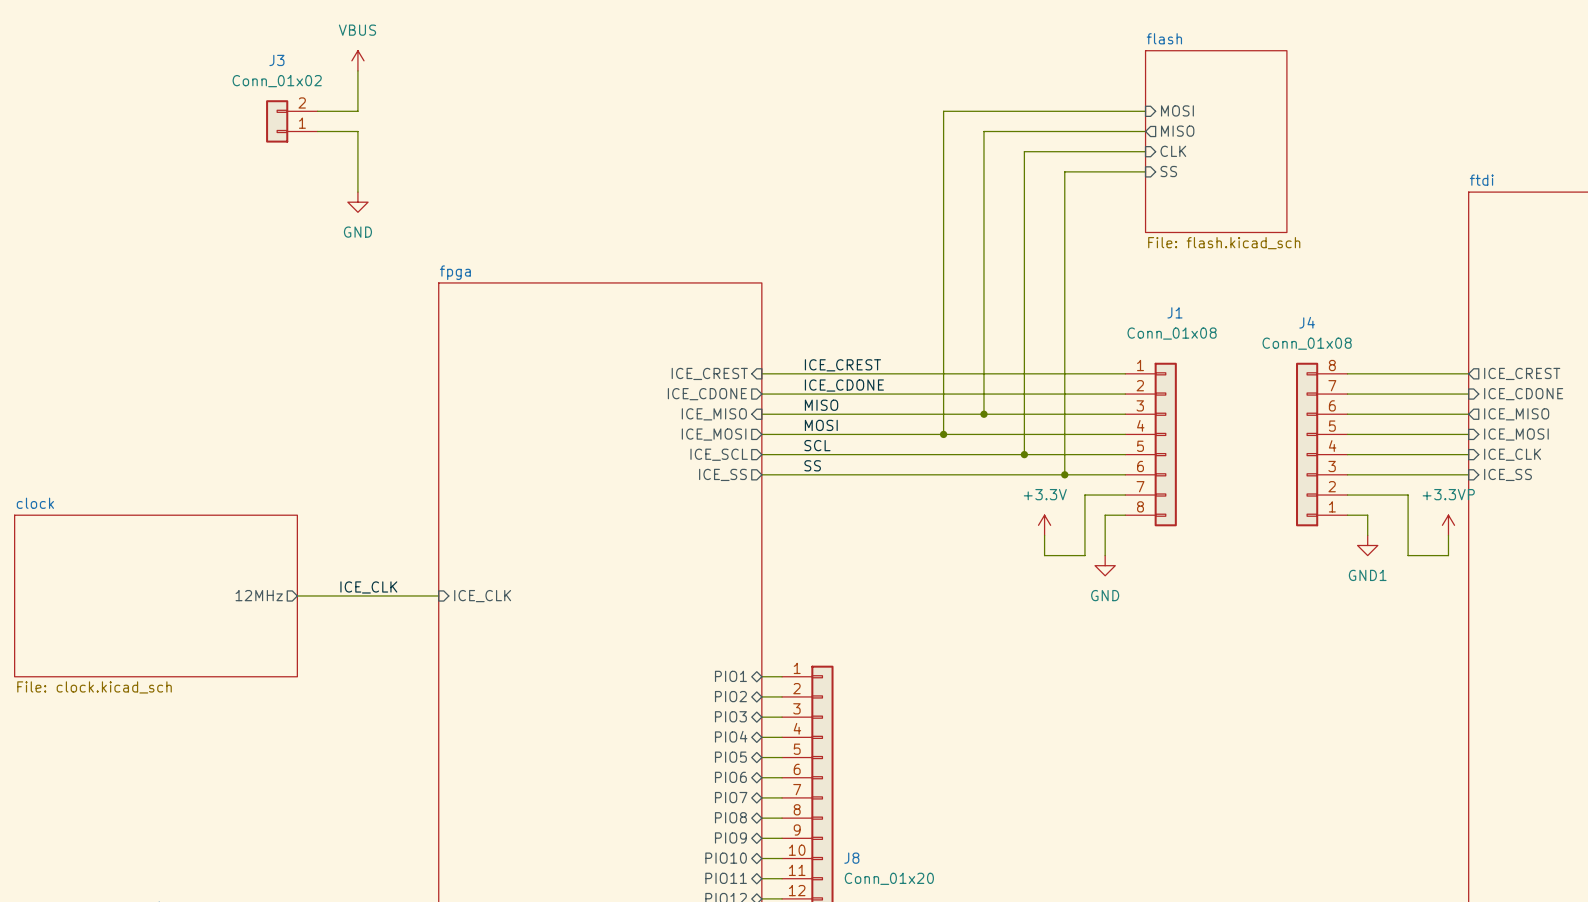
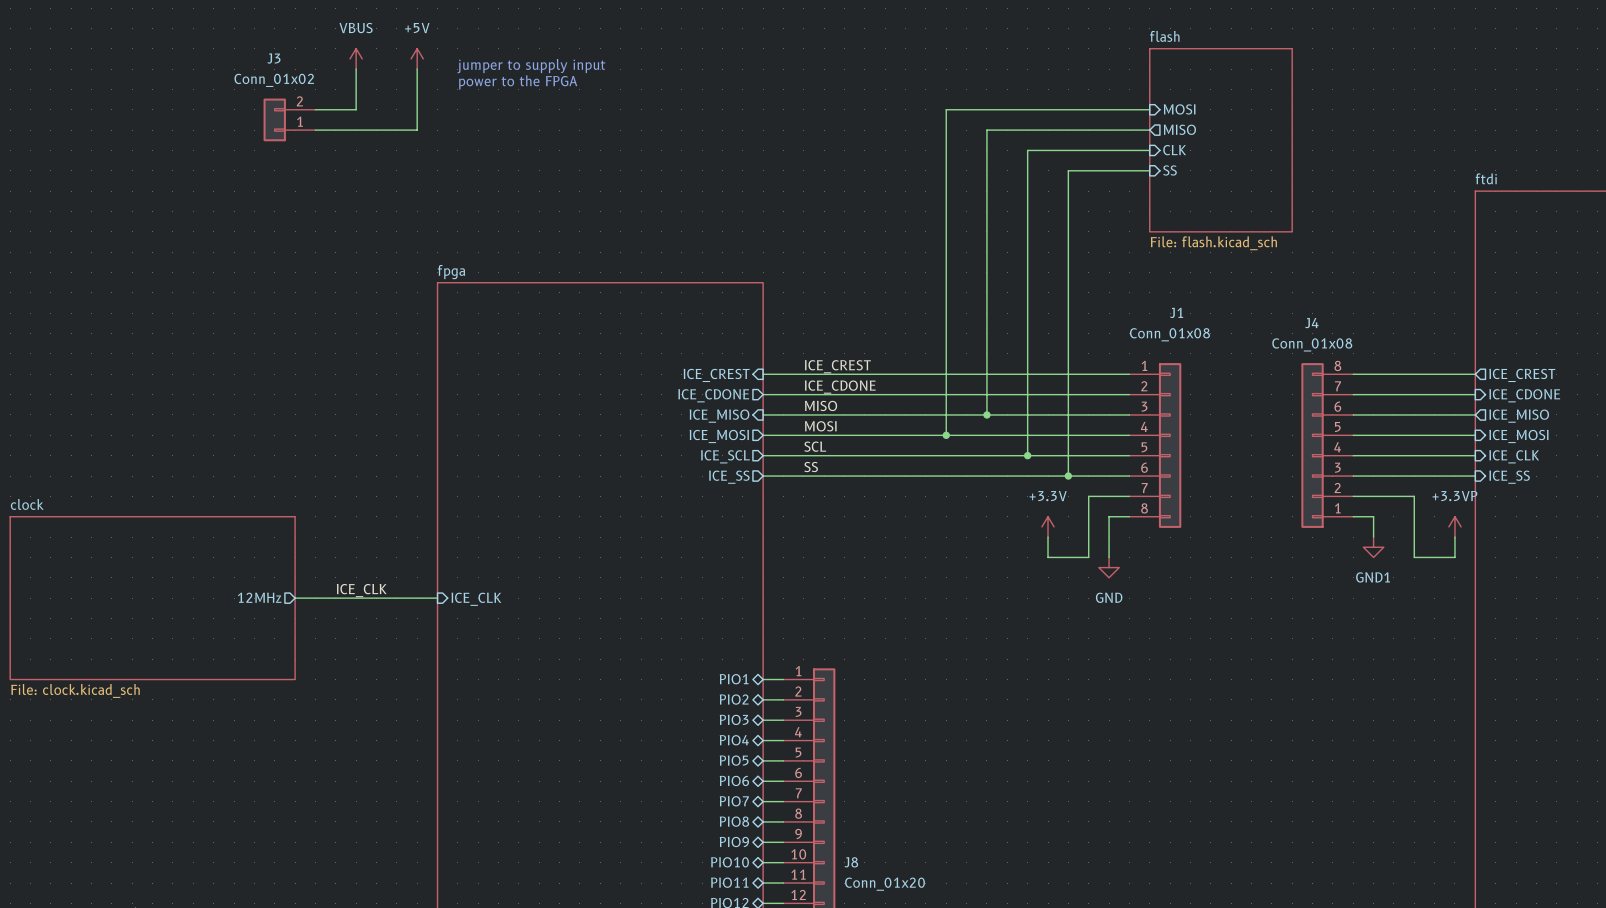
power symbol: none -> +5V (417, 58)
text: none -> jumper to supply input (531, 66)
text: none -> power to the FPGA (518, 82)
wire: (357, 131) (357, 192) -> (356, 130) (417, 130) (417, 69)
power symbol: GND (357, 202) -> none

